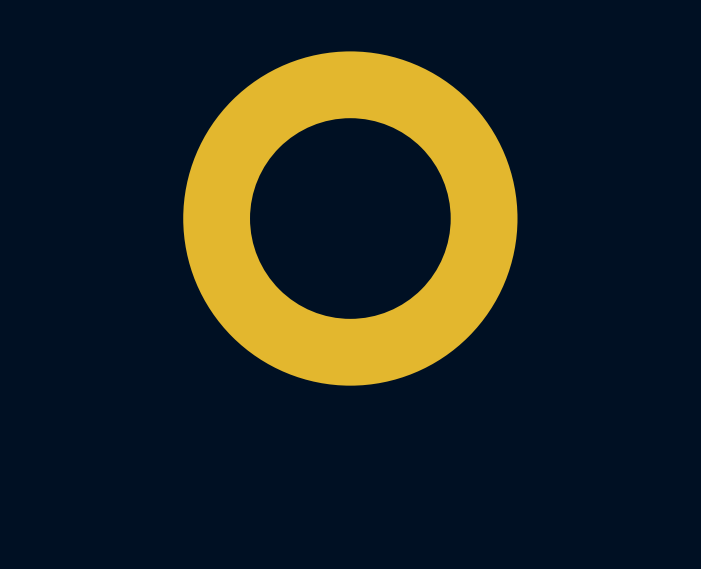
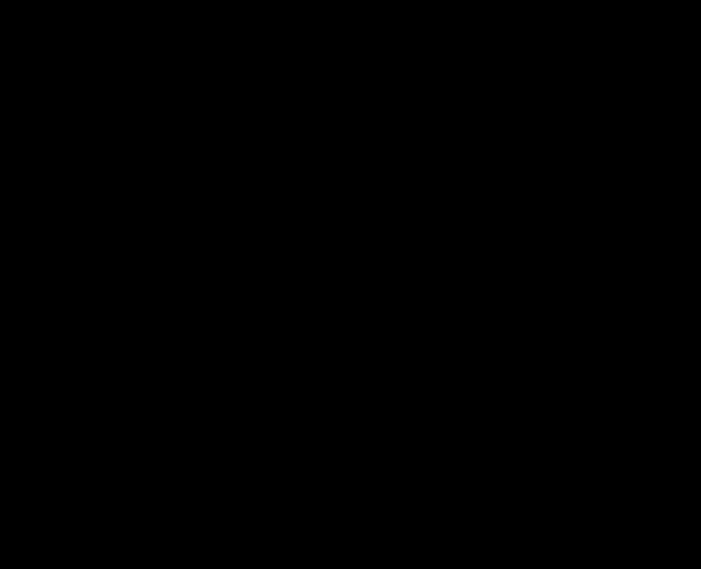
part: (350, 218) -> none

